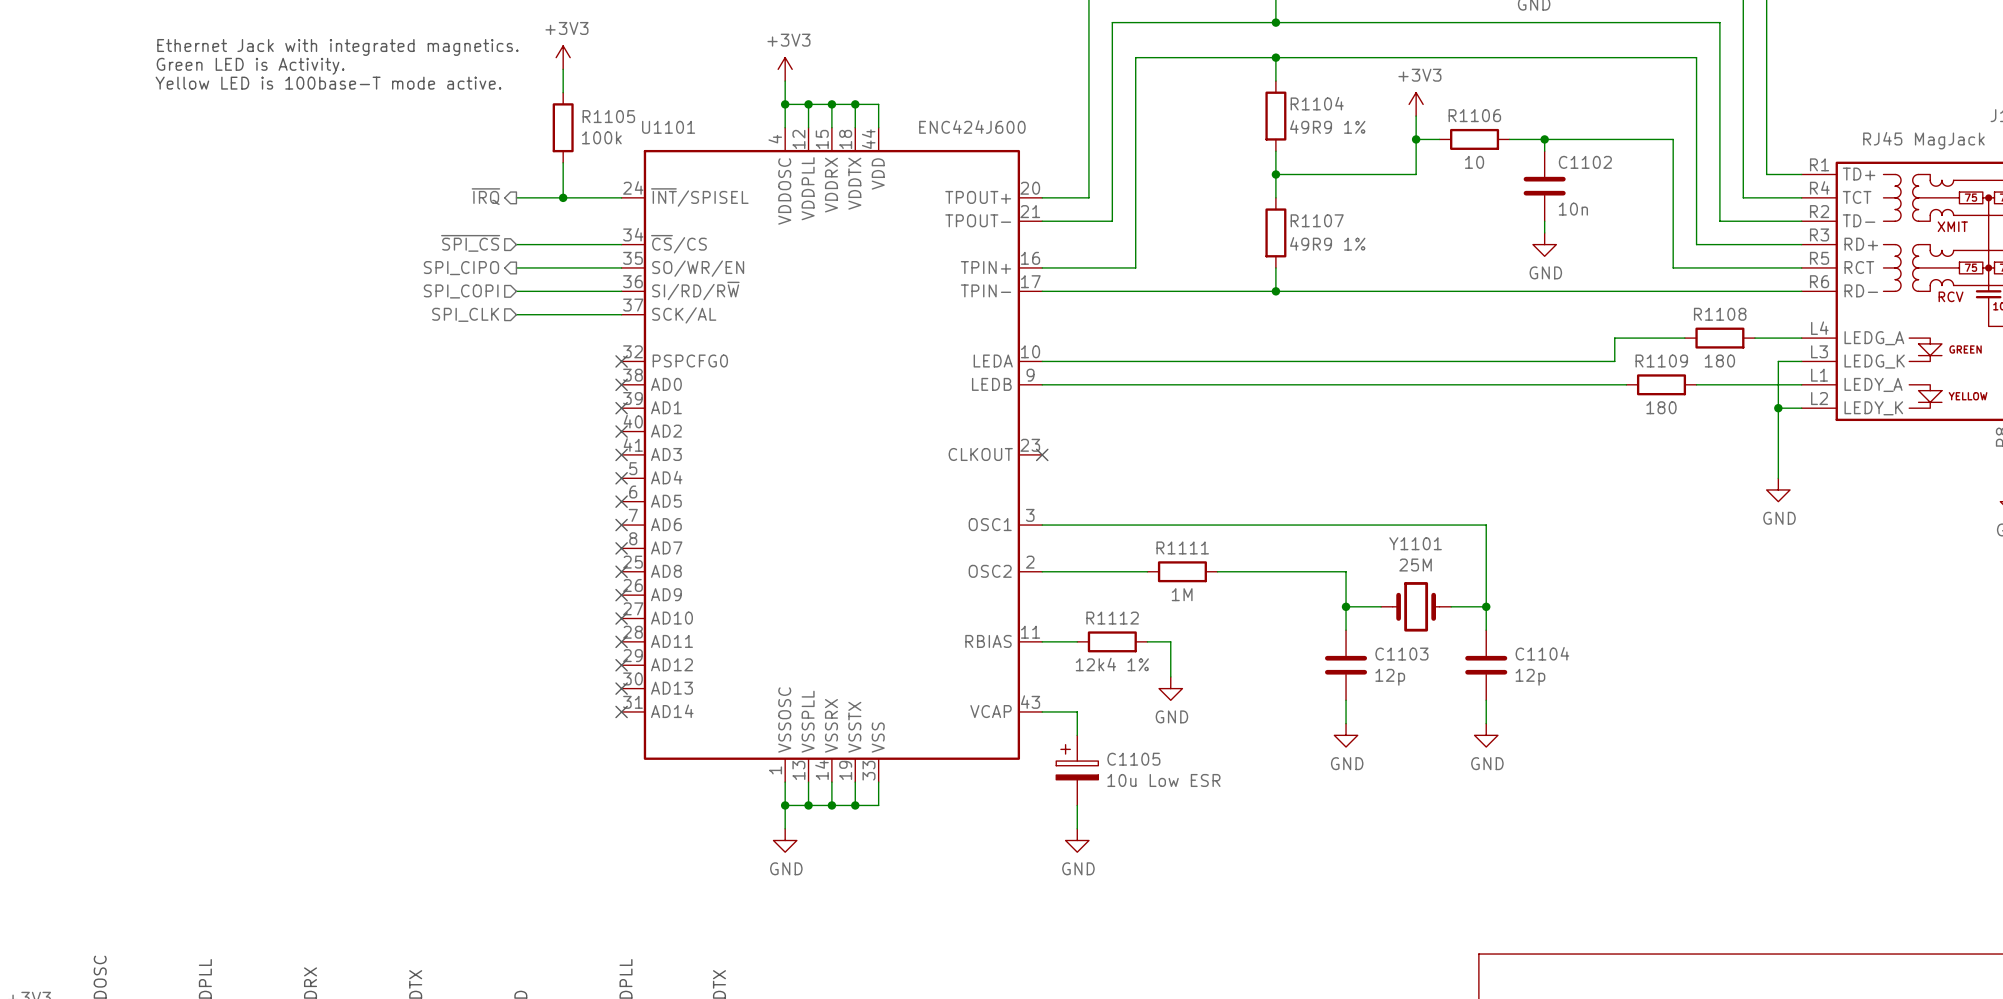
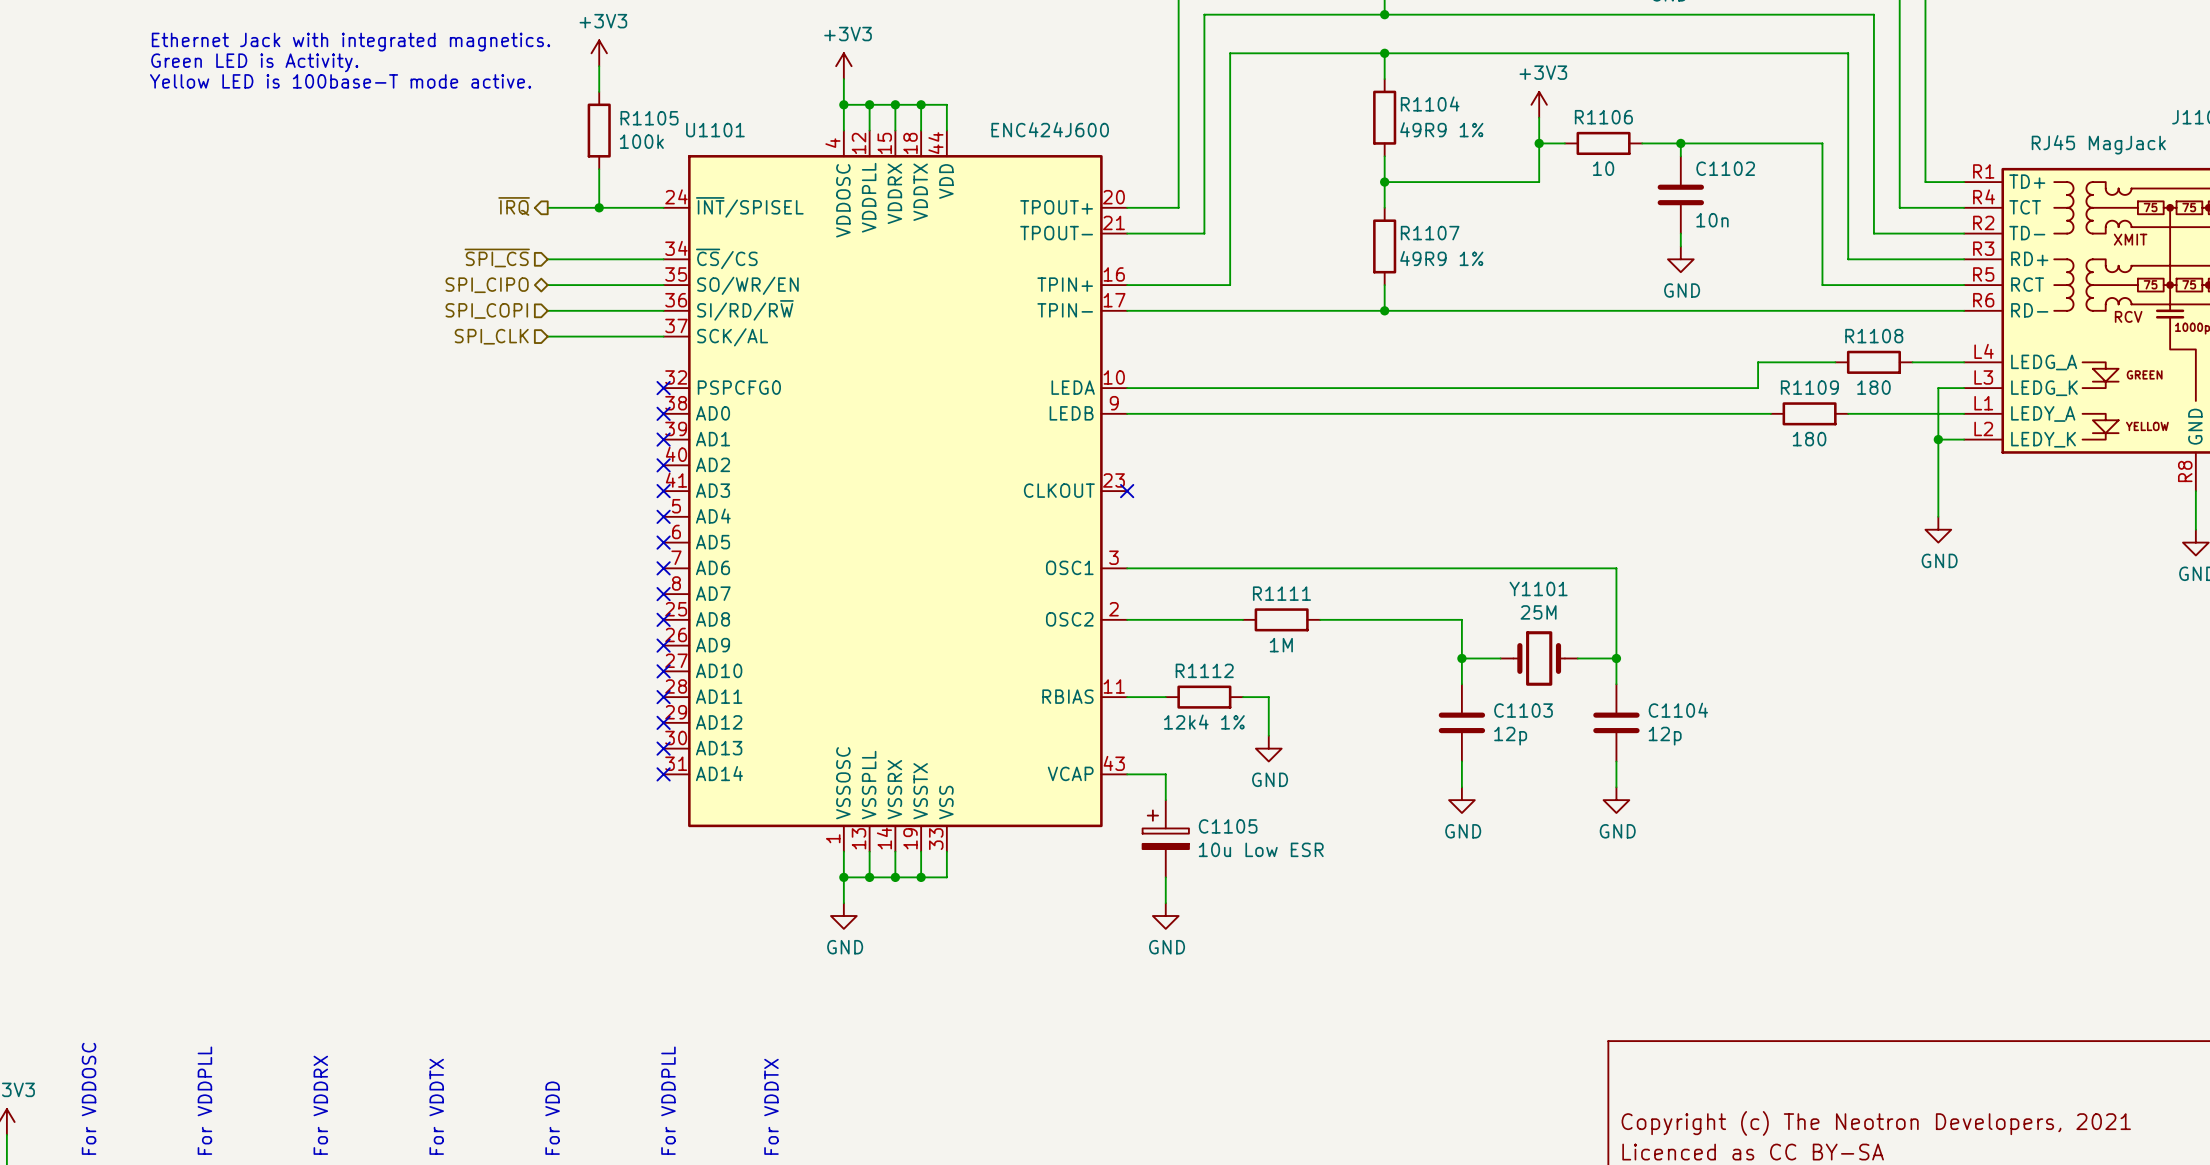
hierarchical label shape: output (461, 268) -> bidirectional (487, 285)

